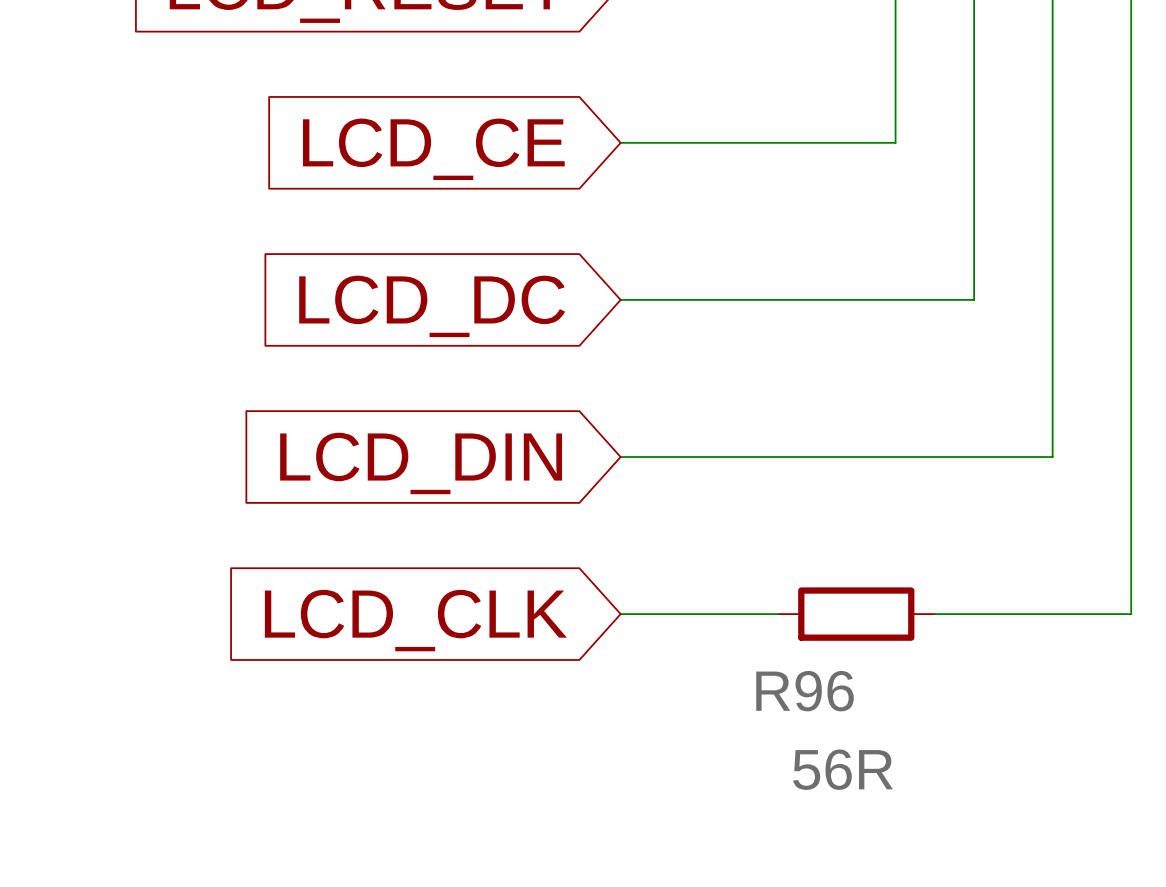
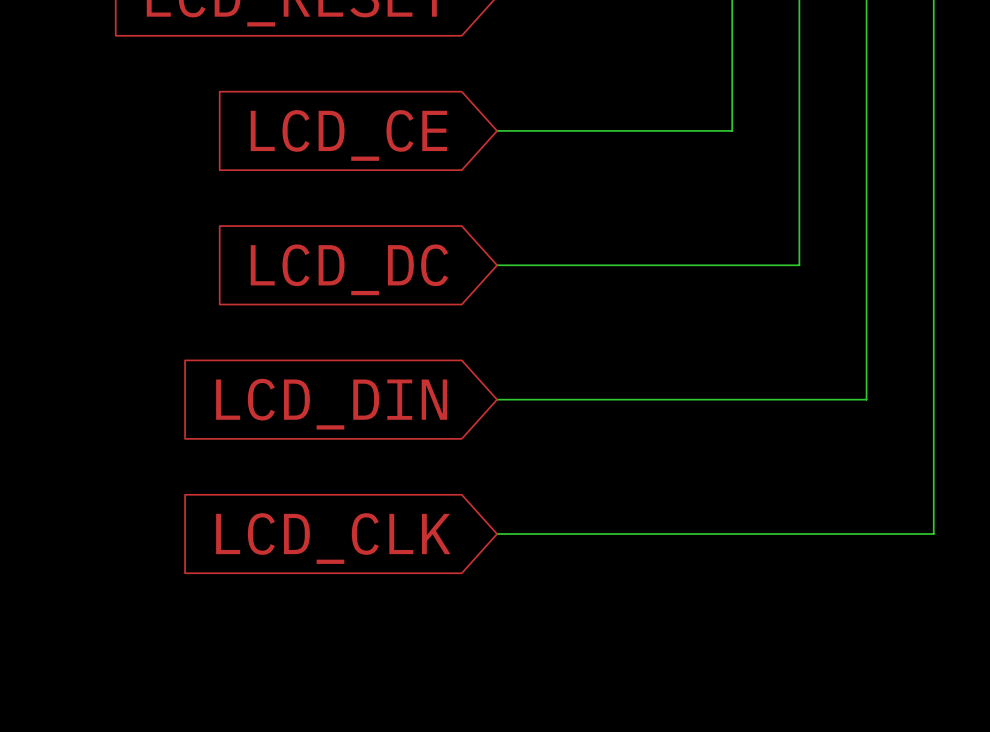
wire: none -> (631, 534) (765, 534)
R96: 56R (856, 614) -> none

